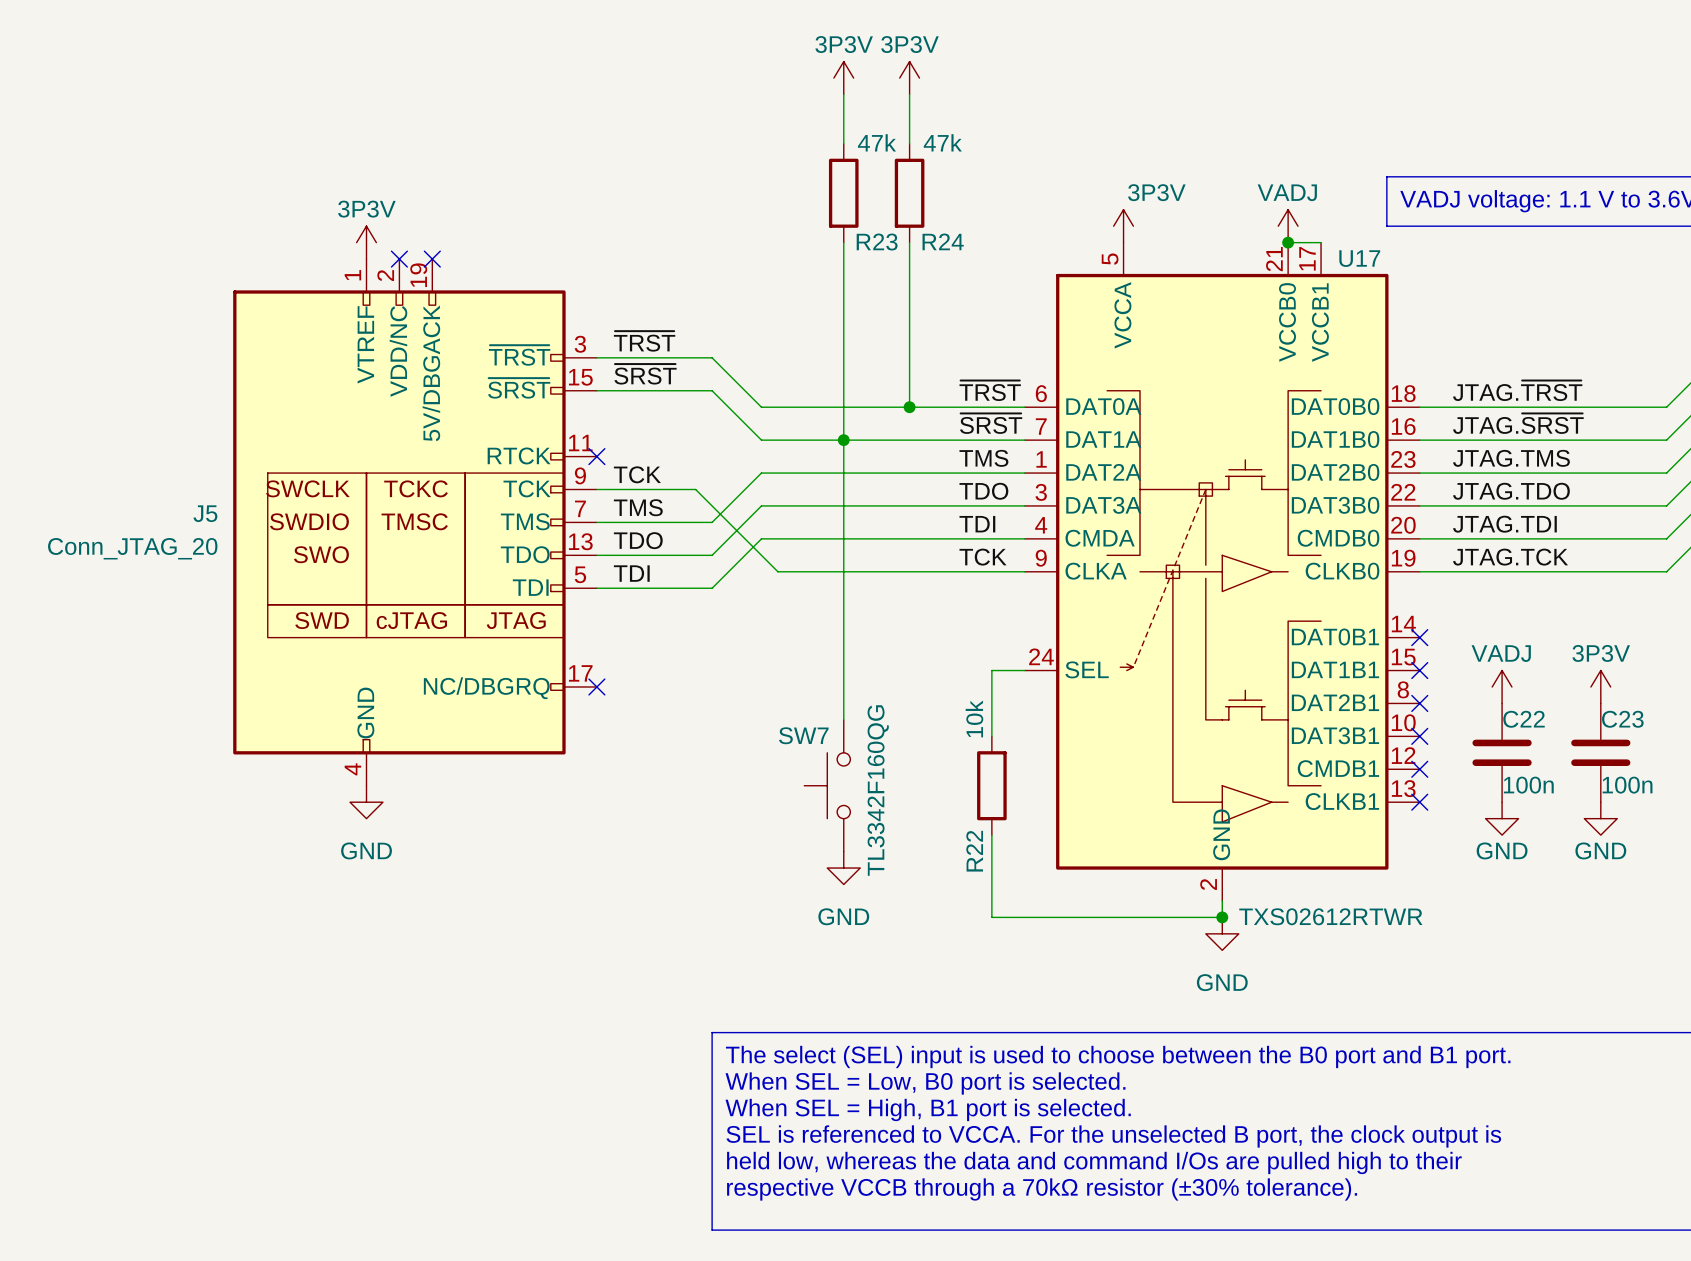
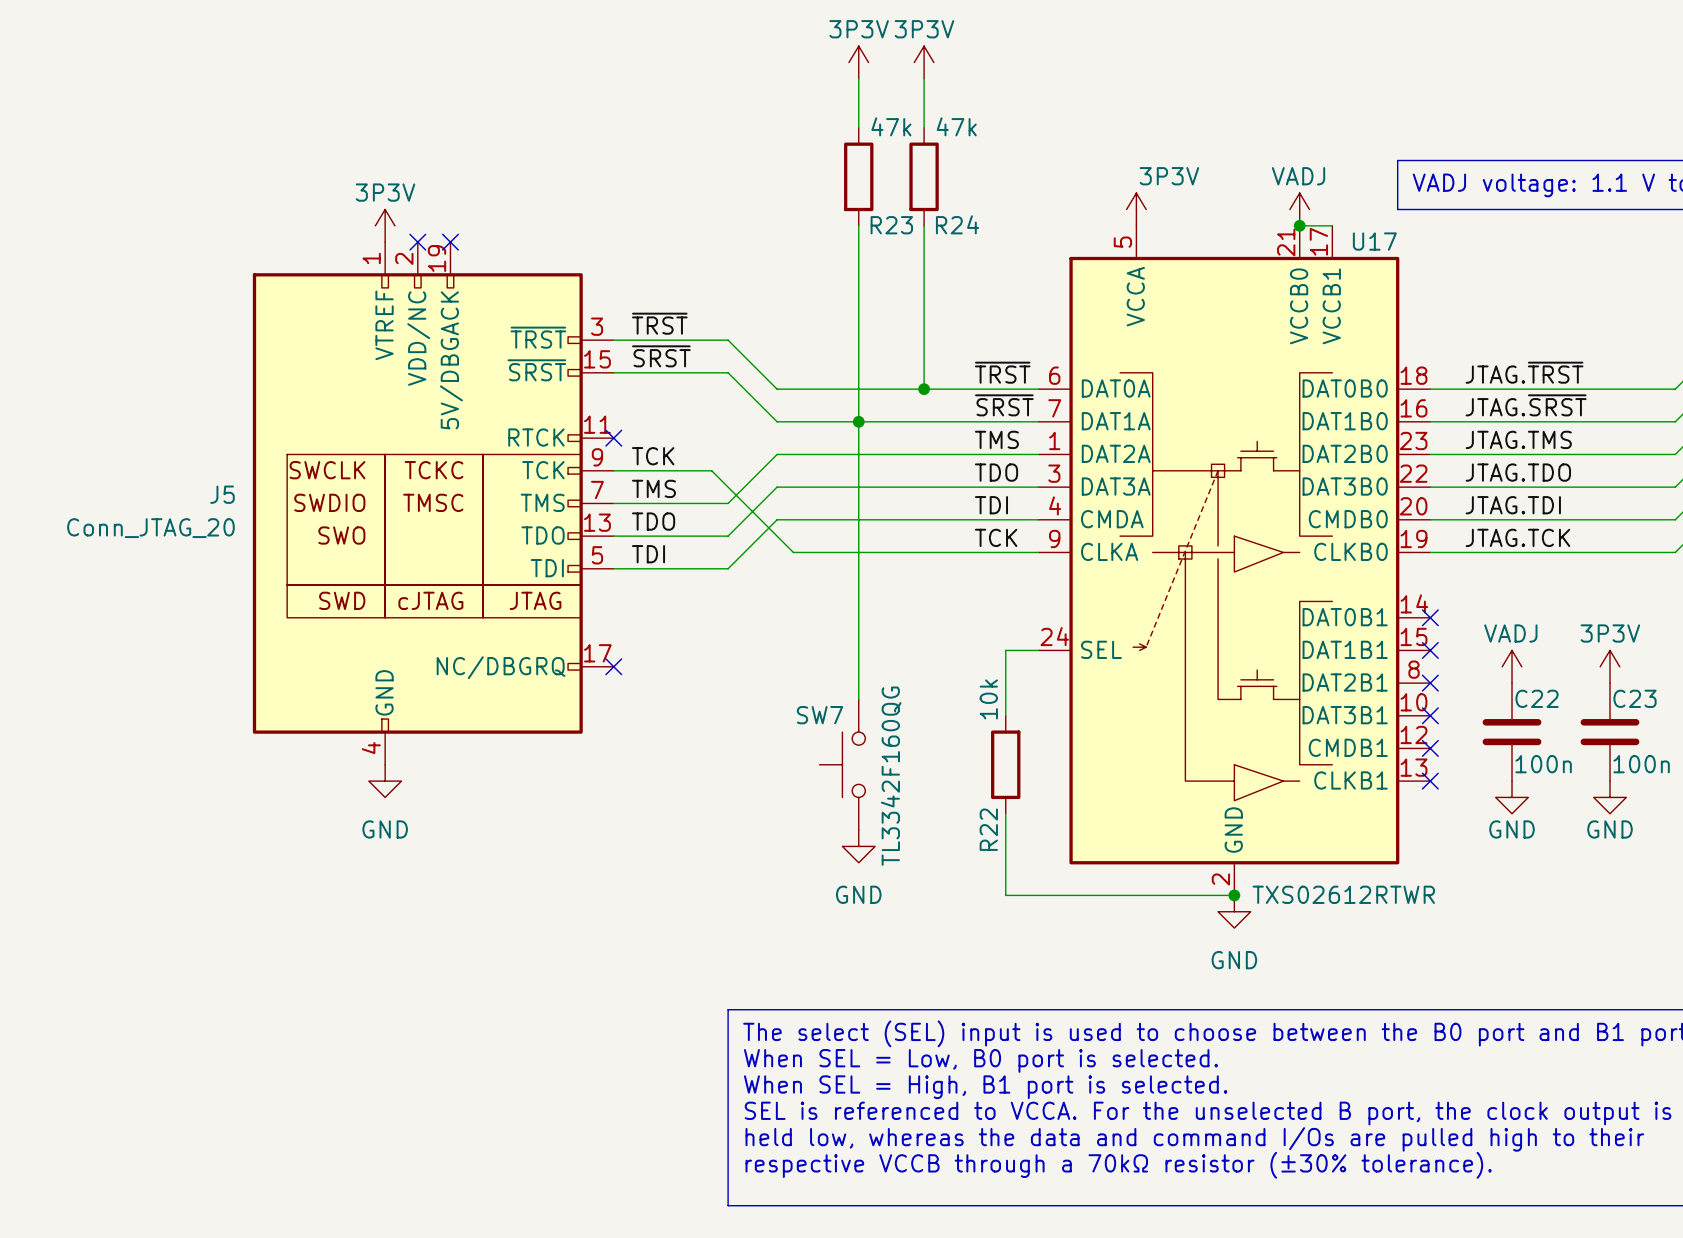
U17 symbol: [1024, 242, 1420, 901] -> [1038, 225, 1431, 896]

